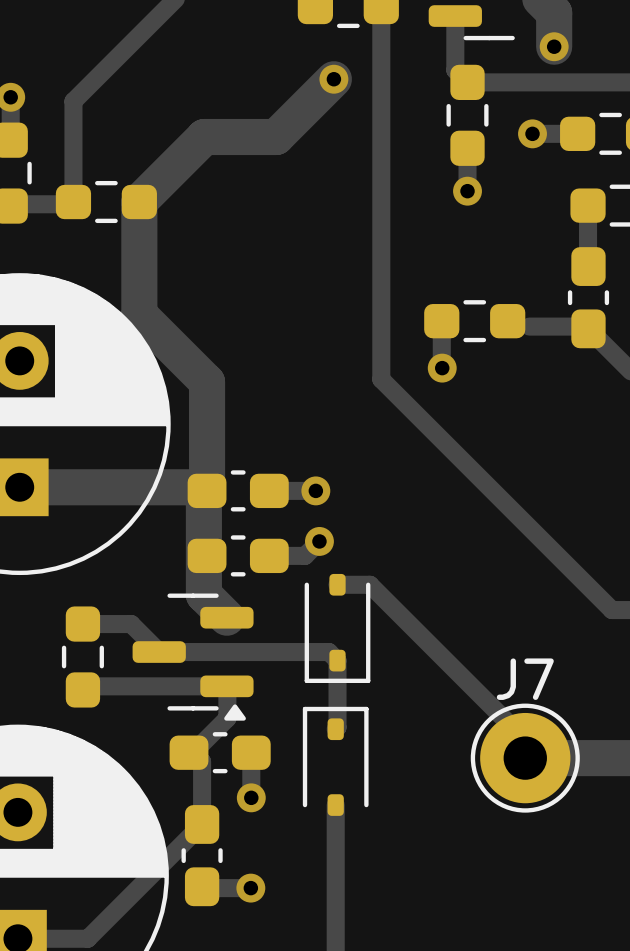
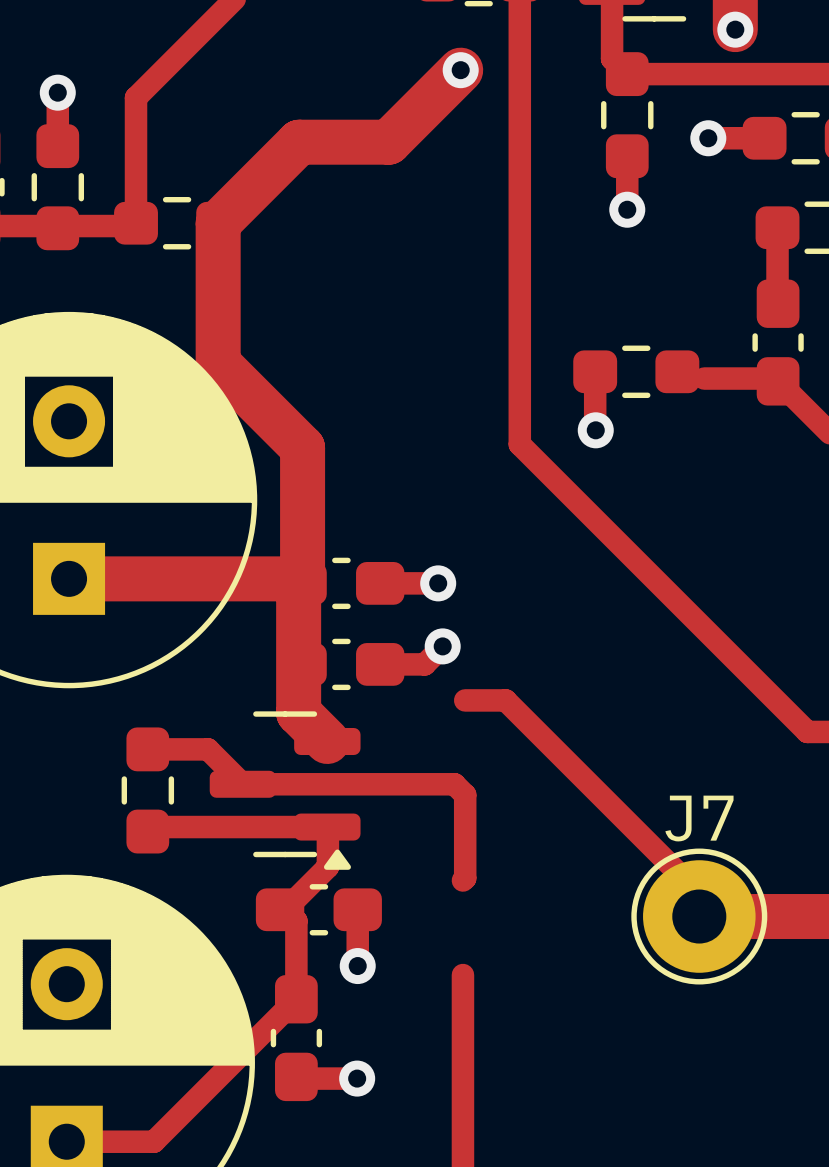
part: (337, 628) -> none
part: (335, 761) -> none

